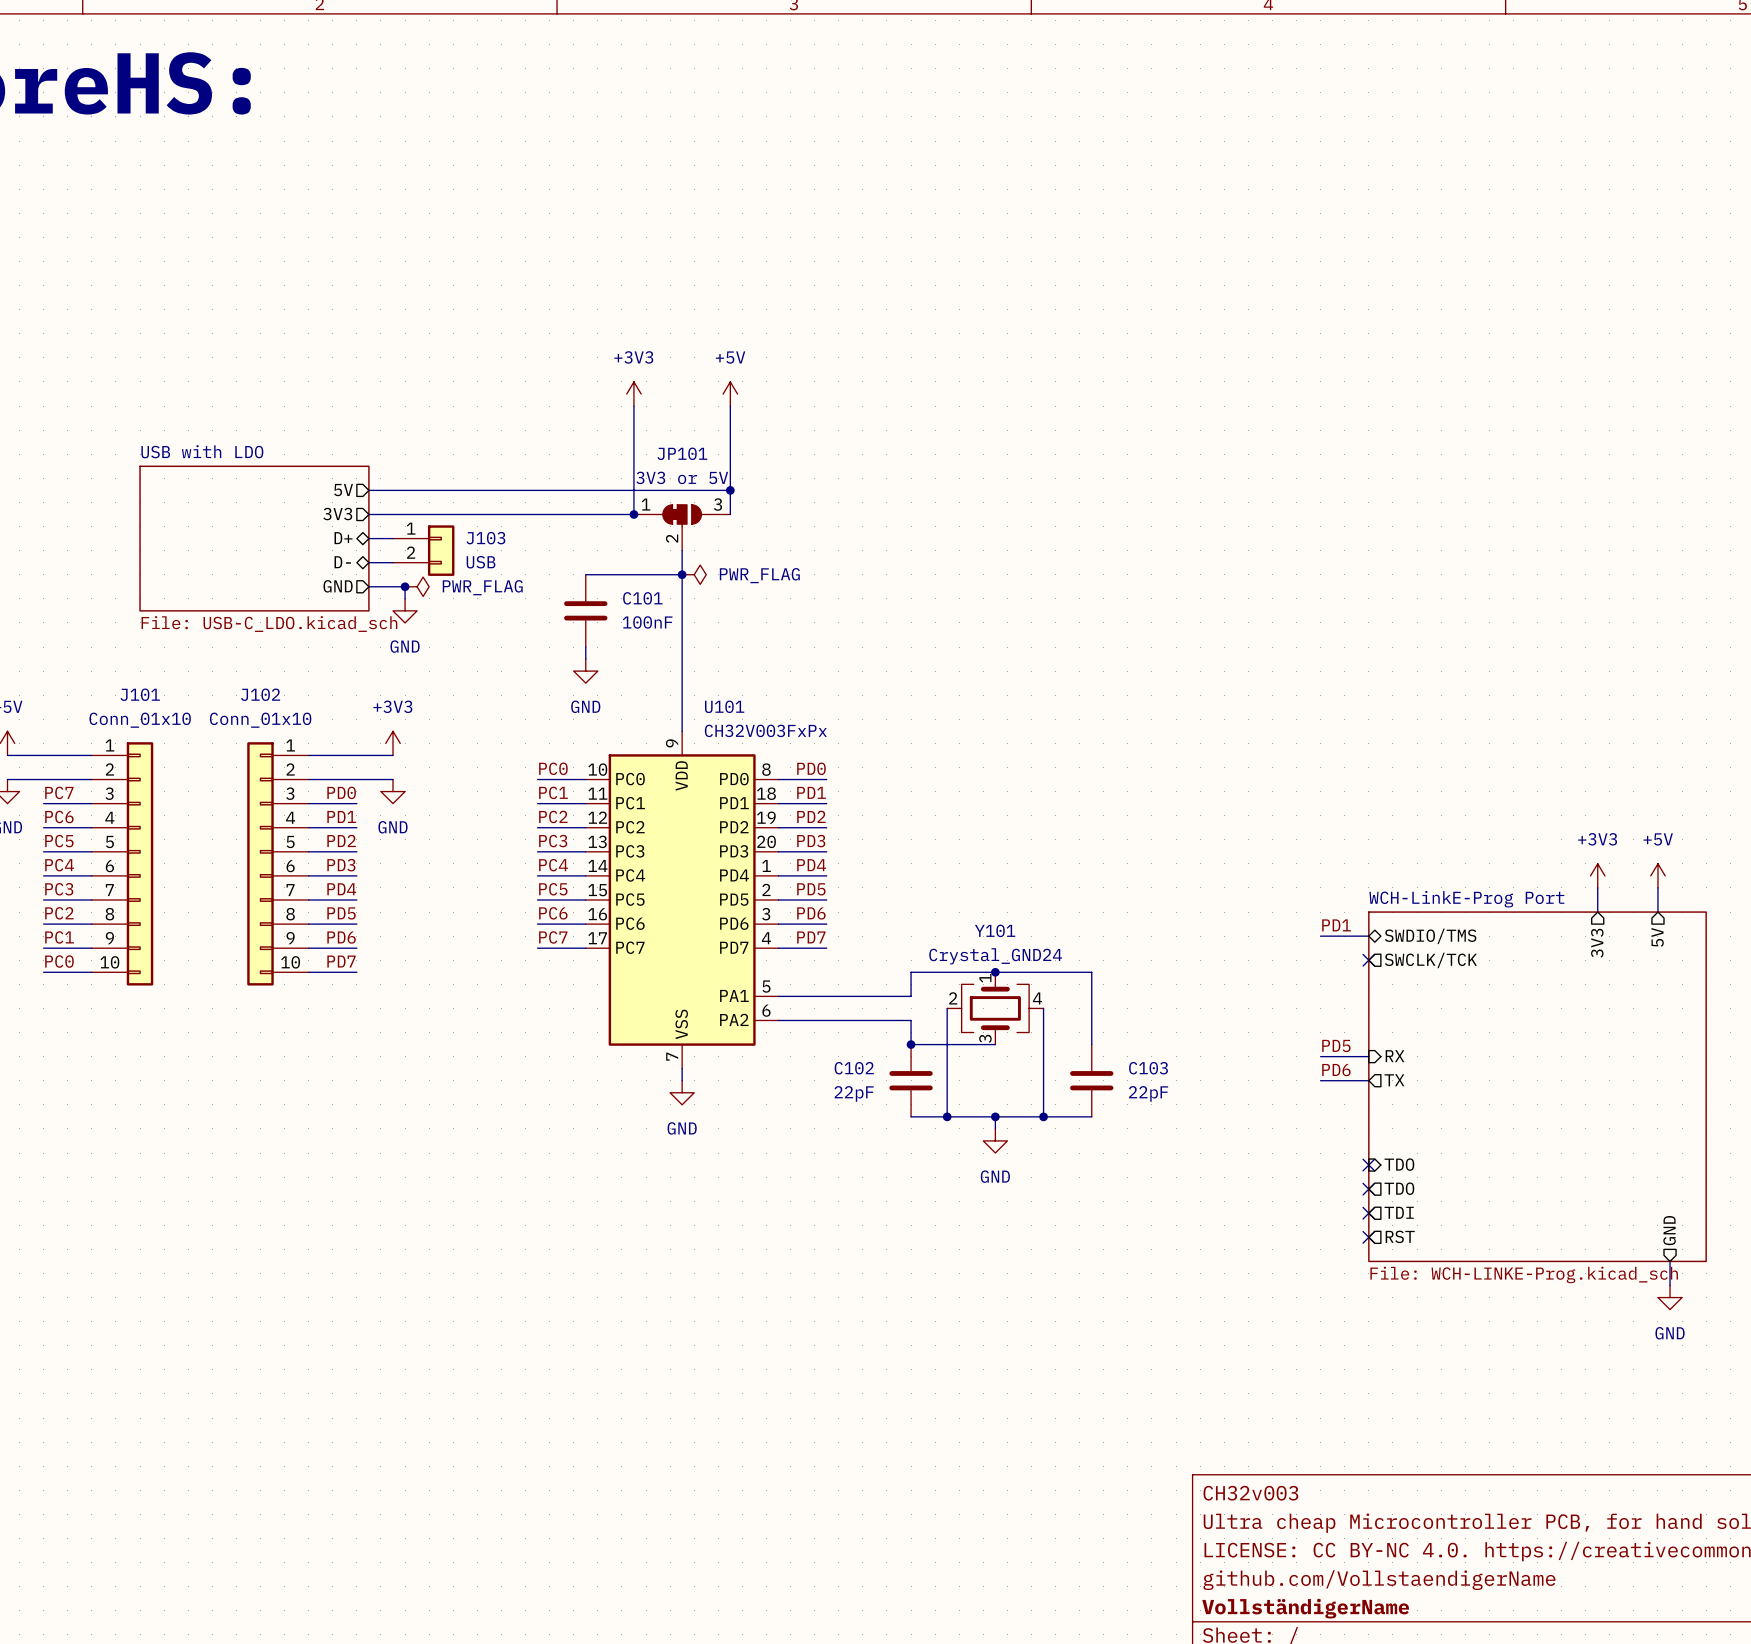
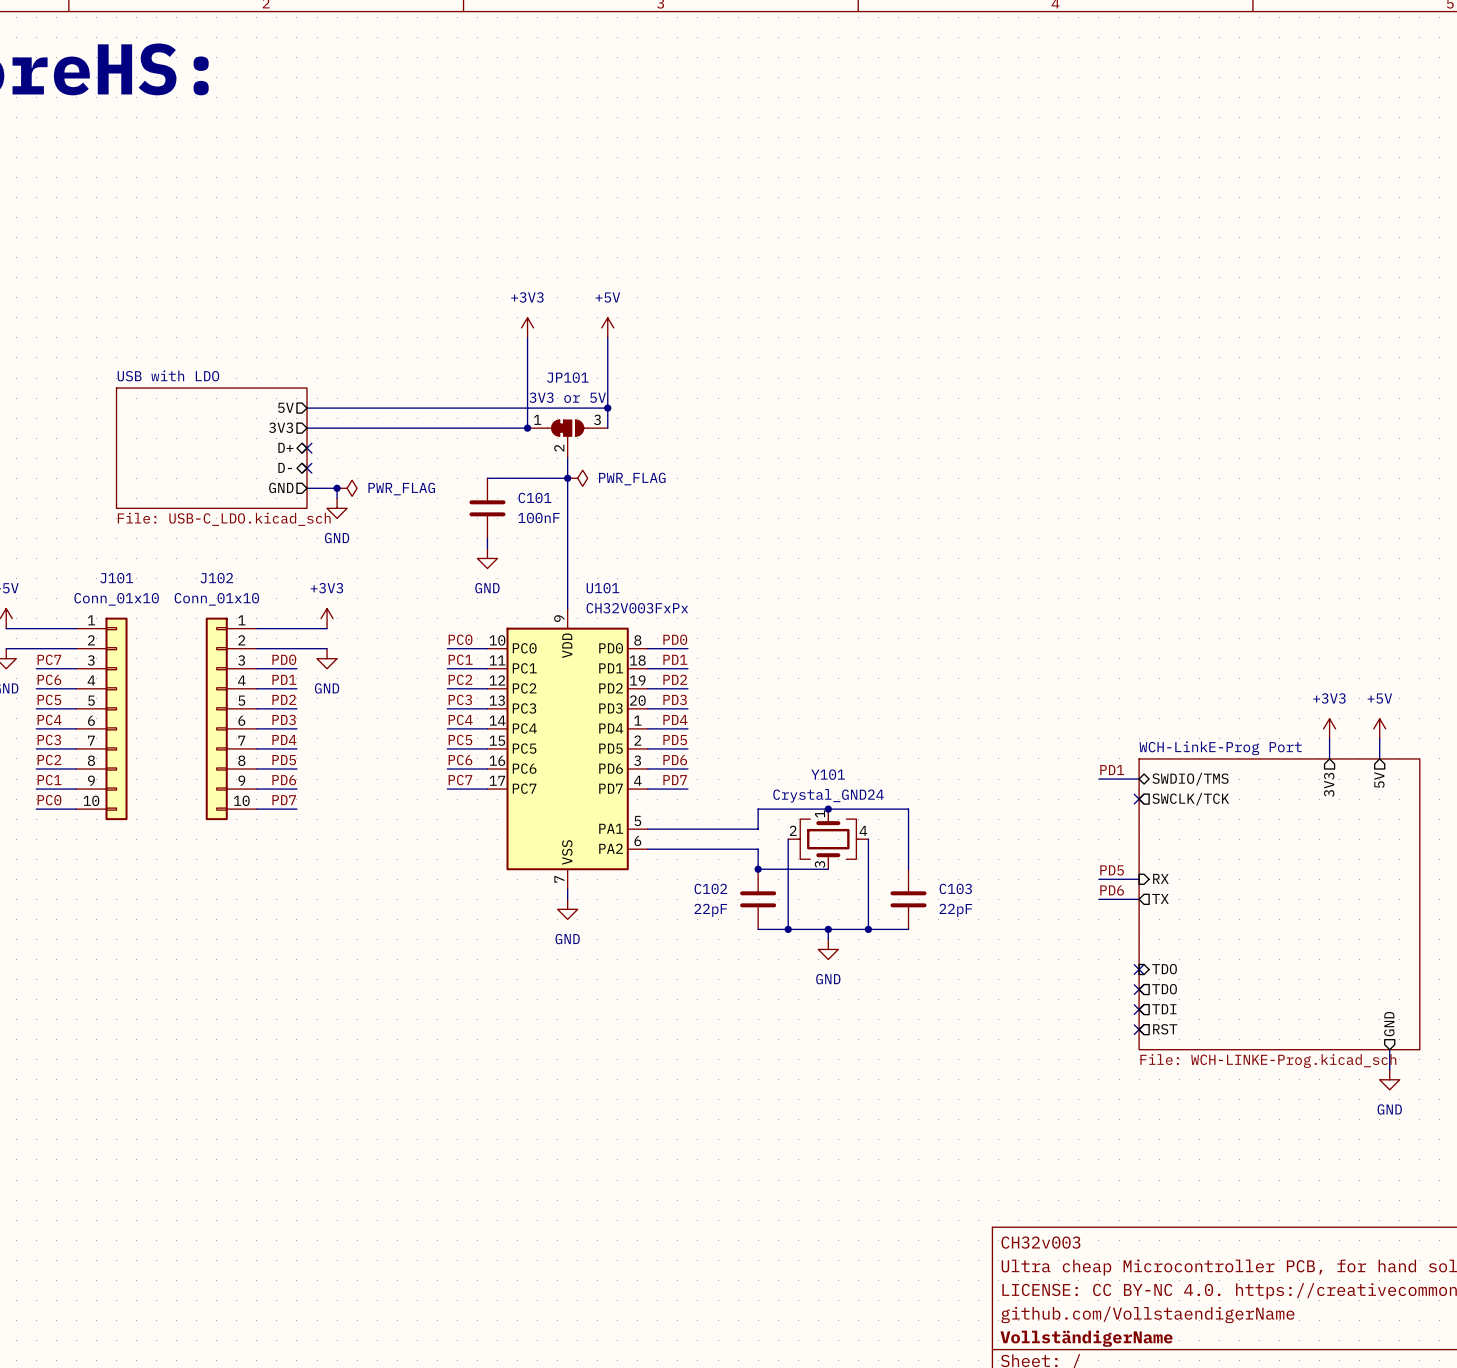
wire: (368, 538) (393, 538) -> none
no-connect mark: none -> (306, 448)
J103: USB (423, 550) -> none
wire: (368, 562) (393, 562) -> none
no-connect mark: none -> (306, 468)

